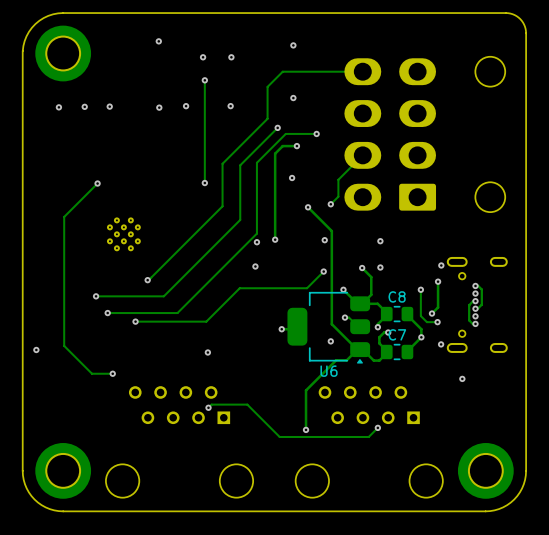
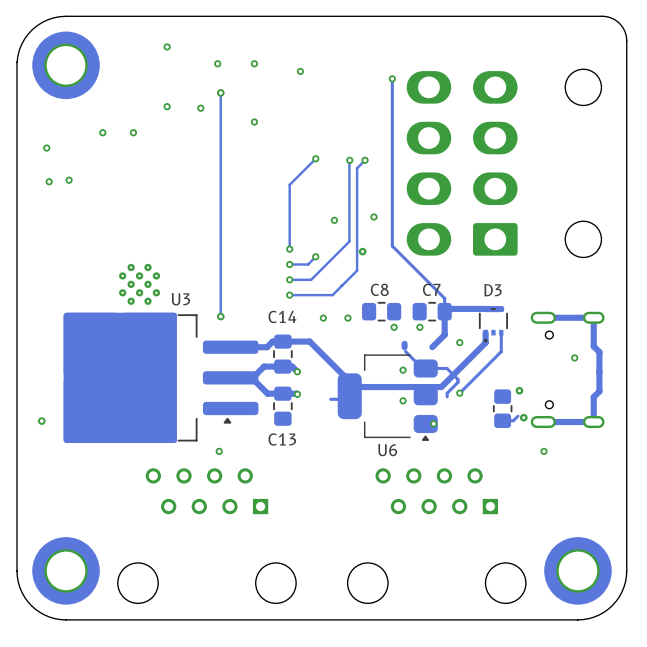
via: none -> (167, 46)
via: (158, 41) -> none
via: (293, 45) -> none
via: none -> (217, 63)
via: none -> (254, 63)
via: (203, 57) -> none
via: (231, 57) -> none
via: none -> (300, 71)
track: none -> (392, 78) (392, 246) (444, 298) (444, 311)
via: none -> (392, 78)
track: (362, 71) (282, 71) (267, 86) (267, 118) (222, 163) (222, 206) (147, 280) -> none
track: none -> (220, 92) (220, 316)
via: none -> (220, 92)
track: (204, 80) (204, 183) -> none
via: (204, 80) -> none
via: none -> (167, 106)
via: none -> (200, 108)
via: (293, 98) -> none
via: none -> (254, 122)
via: (84, 106) -> none
via: (109, 106) -> none
via: (186, 106) -> none
via: (230, 106) -> none
via: (58, 107) -> none
via: (159, 107) -> none
via: none -> (102, 132)
via: none -> (133, 132)
via: none -> (46, 148)
track: (277, 127) (240, 165) (240, 219) (163, 296) (96, 296) -> none
via: (277, 127) -> none
track: none -> (315, 158) (289, 184) (289, 249)
via: none -> (315, 158)
track: none -> (349, 160) (349, 241) (311, 279) (289, 279)
via: none -> (349, 160)
track: none -> (365, 160) (357, 168) (357, 270) (332, 295) (289, 295)
via: none -> (365, 160)
track: (316, 133) (285, 133) (256, 162) (256, 233) (177, 313) (107, 313) -> none
via: (316, 133) -> none
track: (296, 146) (282, 146) (275, 153) (275, 239) -> none
via: (296, 146) -> none
via: none -> (69, 180)
via: none -> (49, 181)
track: (362, 155) (338, 179) (338, 196) (330, 204) -> none
via: (292, 177) -> none
via: none -> (373, 217)
via: none -> (334, 220)
track: (97, 183) (64, 216) (64, 345) (92, 373) (112, 373) -> none
via: (97, 183) -> none
via: (204, 183) -> none
via: (330, 204) -> none
via: none -> (289, 249)
track: (308, 207) (331, 231) (331, 324) (357, 349) (362, 349) (373, 360) (379, 360) (386, 353) (379, 343) (379, 337) (384, 332) (388, 332) -> none
track: none -> (315, 256) (308, 264) (289, 264)
via: none -> (315, 256)
via: none -> (289, 264)
via: none -> (289, 279)
via: (275, 239) -> none
via: (324, 240) -> none
via: (380, 241) -> none
via: (256, 242) -> none
via: none -> (289, 295)
track: none -> (485, 308) (447, 308)
track: none -> (501, 309) (485, 309)
track: none -> (444, 311) (444, 334) (432, 347)
via: none -> (220, 316)
track: none -> (543, 317) (593, 317) (593, 346) (599, 352) (599, 391) (593, 397) (593, 422) (543, 422)
via: none -> (323, 318)
via: none -> (347, 318)
via: (441, 265) -> none
via: (255, 266) -> none
via: (380, 267) -> none
D3: none -> (493, 324)
track: (362, 268) (371, 277) (371, 294) (362, 303) -> none
via: (362, 268) -> none
via: none -> (394, 327)
via: none -> (419, 327)
track: (323, 271) (307, 288) (239, 288) (206, 321) (135, 321) -> none
via: (323, 271) -> none
track: none -> (485, 332) (485, 342) (441, 387) (355, 387) (309, 341) (272, 341) (267, 347) (230, 347)
track: none -> (501, 332) (501, 351) (459, 393)
via: (147, 280) -> none
track: (438, 281) (438, 307) (431, 313) -> none
via: (438, 281) -> none
via: none -> (459, 342)
track: none -> (404, 343) (404, 347)
track: (475, 285) (481, 289) (481, 304) (475, 308) -> none
via: (475, 285) -> none
via: (343, 289) -> none
track: (420, 289) (420, 316) (426, 322) (437, 322) -> none
via: (420, 289) -> none
C14: none -> (282, 354)
via: (475, 293) -> none
via: none -> (574, 357)
via: (96, 296) -> none
track: (475, 301) (469, 305) (469, 320) (475, 324) -> none
via: (475, 301) -> none
via: none -> (403, 370)
track: none -> (297, 371) (292, 366) (264, 366) (252, 377)
via: none -> (297, 371)
C8 footprint: [380, 306, 414, 322] -> [362, 301, 402, 322]
via: (475, 308) -> none
U3: none -> (161, 377)
track: none -> (251, 377) (267, 393) (297, 394)
via: (107, 313) -> none
via: (431, 313) -> none
track: (407, 314) (421, 329) (421, 337) (407, 351) -> none
via: (475, 316) -> none
via: (344, 317) -> none
via: (135, 321) -> none
via: (475, 323) -> none
via: none -> (459, 393)
via: none -> (297, 394)
via: (377, 327) -> none
via: (281, 329) -> none
via: none -> (403, 400)
via: (388, 332) -> none
C13: none -> (282, 406)
part: none -> (502, 408)
via: (421, 337) -> none
via: (330, 341) -> none
track: none -> (517, 416) (513, 420) (502, 420)
C7 footprint: [380, 344, 414, 360] -> [412, 301, 452, 322]
via: none -> (41, 421)
via: (36, 349) -> none
track: (357, 349) (346, 360) (336, 360) (306, 390) (306, 429) -> none
via: none -> (433, 423)
via: (207, 352) -> none
via: none -> (219, 451)
via: none -> (544, 451)
via: (112, 373) -> none
via: (462, 378) -> none
track: (208, 407) (211, 404) (247, 404) (279, 436) (368, 436) (377, 427) -> none
via: (208, 407) -> none
via: (377, 427) -> none
via: (306, 429) -> none

